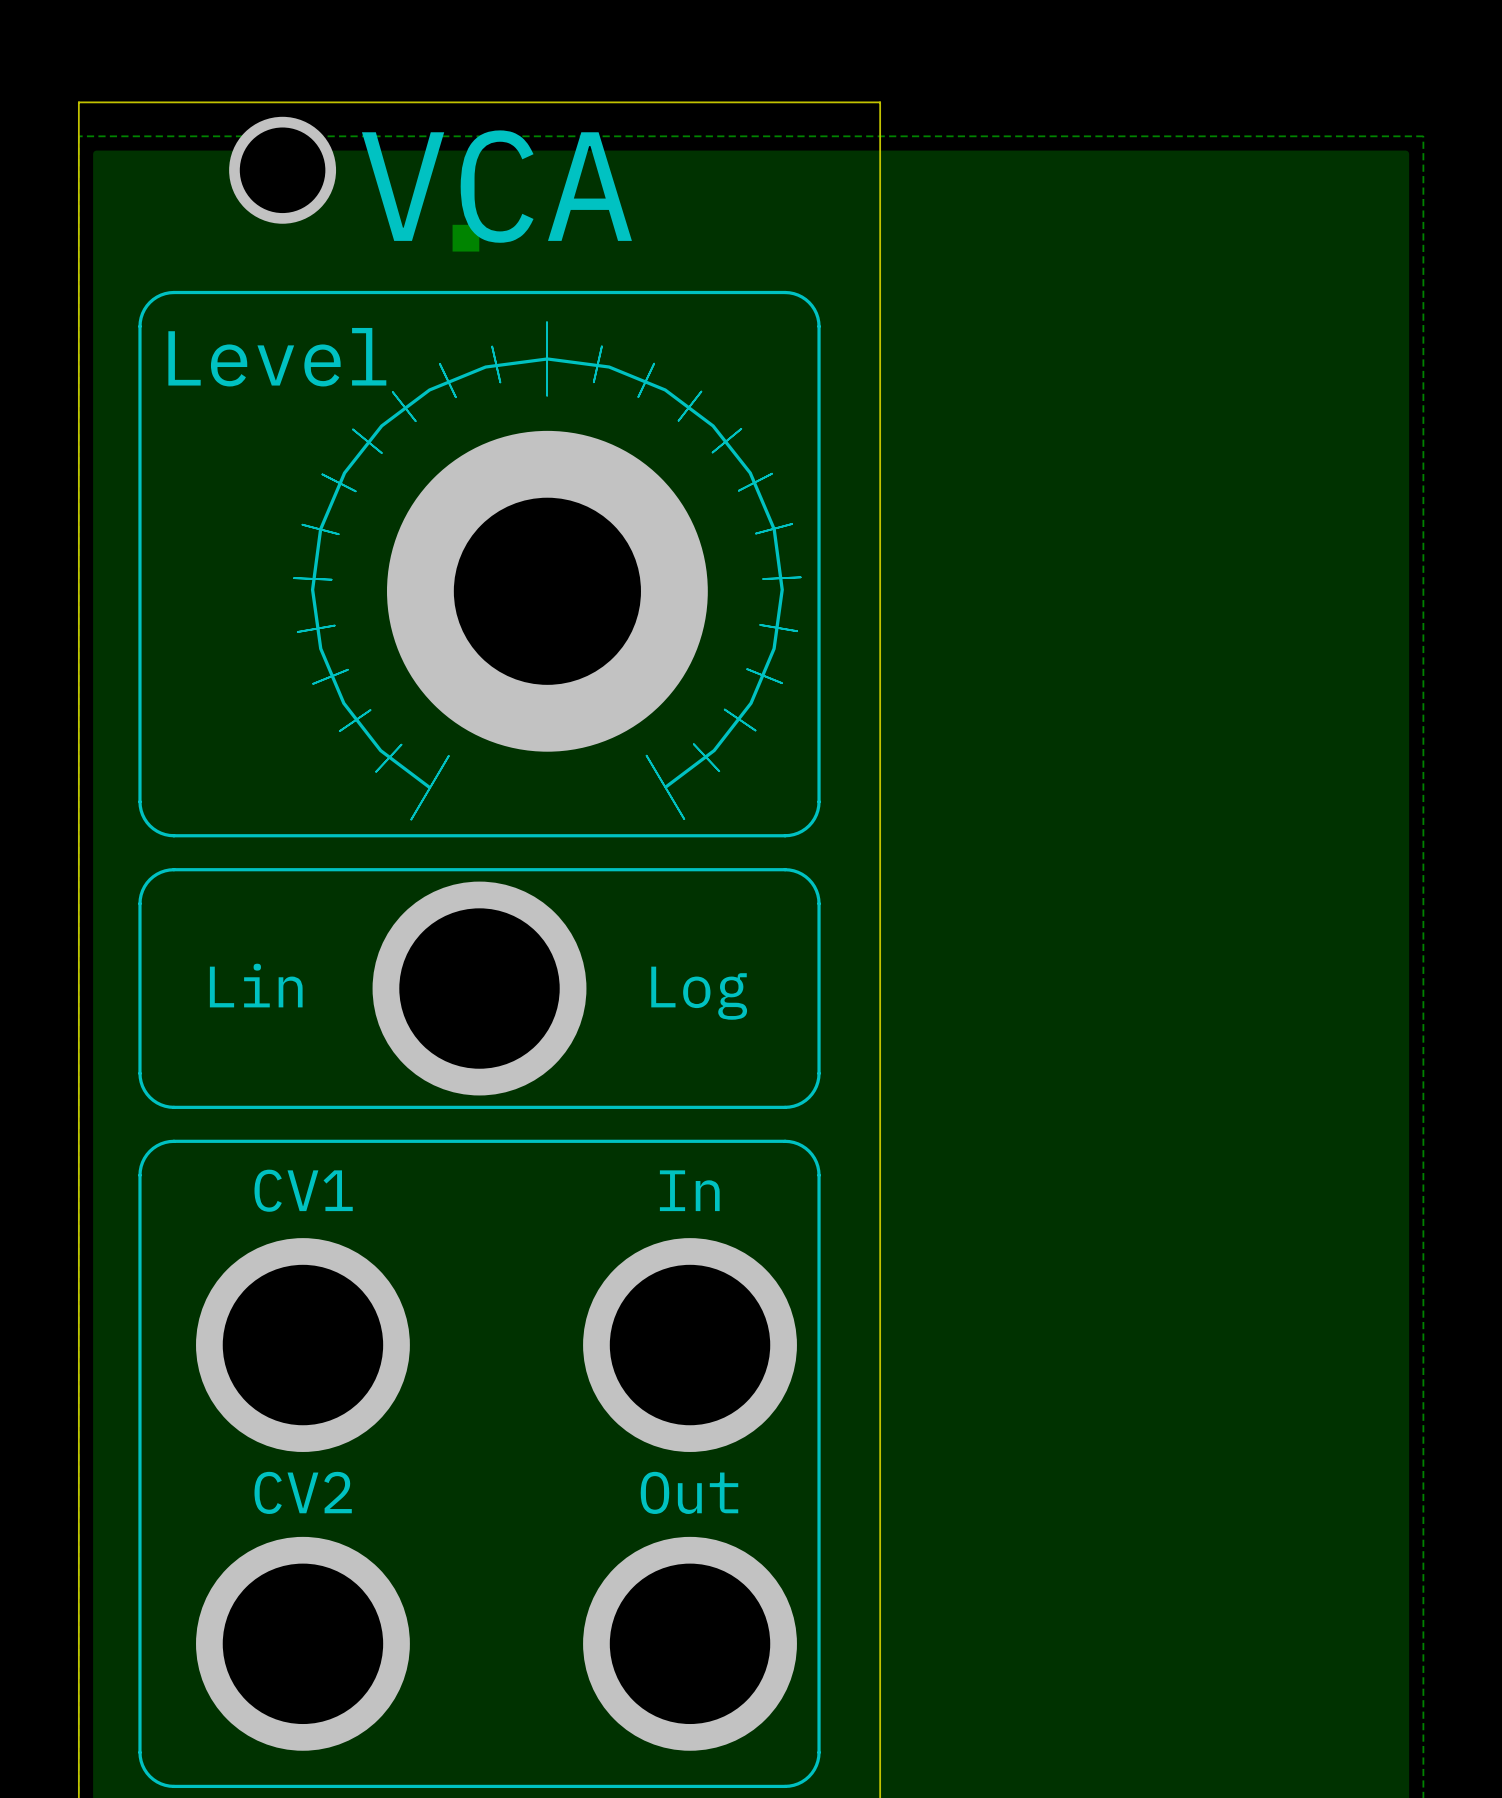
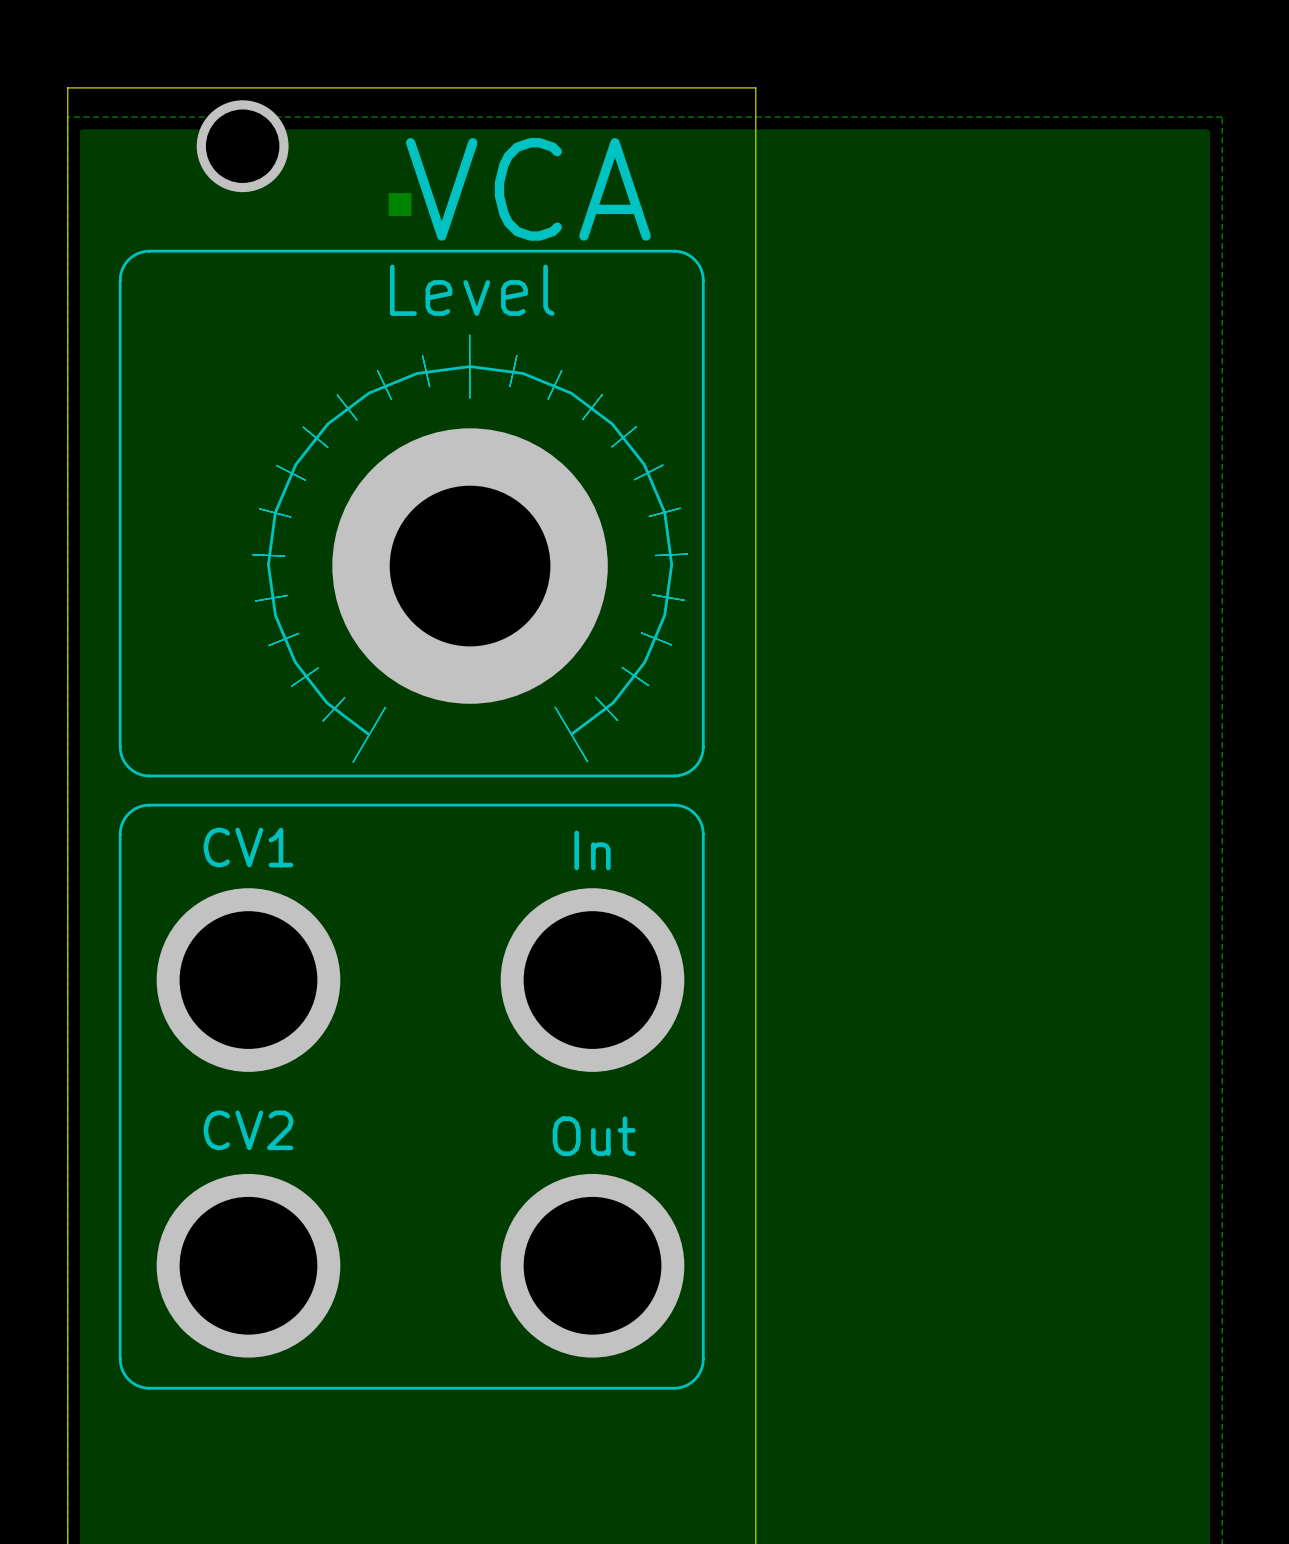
text position: VCA (496, 186) -> VCA (528, 189)
text position: Level (277, 357) -> Level (472, 290)
drawing position: (547, 570) -> (470, 548)
via position: (547, 591) -> (470, 566)
line: (139, 801) (142, 814) (149, 825) (160, 833) (173, 835) (785, 835) (798, 833) (809, 825) (816, 814) (819, 801) -> (120, 688) (121, 754) (131, 769) (149, 775) (677, 775) (691, 769) (702, 754) (703, 688)
line: (139, 971) (141, 894) (144, 886) (153, 876) (165, 870) (173, 869) (789, 869) (805, 876) (814, 886) (817, 894) (819, 971) -> (120, 834) (122, 823) (128, 813) (138, 807) (149, 805) (674, 805) (685, 807) (694, 813) (701, 823) (703, 834)
text: Lin (256, 985) -> none
via: (479, 988) -> none
text: Log (699, 993) -> none
line: (139, 1073) (142, 1086) (149, 1097) (160, 1104) (173, 1107) (785, 1107) (798, 1104) (809, 1097) (816, 1086) (819, 1073) -> (120, 921) (120, 1009)
via: none -> (248, 980)
via: none -> (592, 980)
line: (139, 1175) (142, 1162) (149, 1151) (160, 1143) (173, 1141) (785, 1141) (798, 1143) (809, 1151) (816, 1162) (819, 1175) -> (703, 921) (703, 1009)
text position: CV1 (303, 1190) -> CV1 (248, 847)
text position: In (689, 1190) -> In (592, 850)
via: (302, 1345) -> none
via: (690, 1345) -> none
via: none -> (248, 1265)
via: none -> (592, 1265)
text position: CV2 (303, 1492) -> CV2 (248, 1130)
text position: Out (689, 1492) -> Out (594, 1136)
line: (139, 1582) (140, 1756) (146, 1773) (156, 1781) (165, 1785) (785, 1786) (798, 1783) (805, 1779) (814, 1769) (818, 1756) (819, 1582) -> (120, 1359) (122, 1370) (128, 1379) (138, 1386) (149, 1388) (674, 1388) (685, 1386) (694, 1379) (701, 1370) (703, 1359)
via: (302, 1643) -> none
via: (690, 1643) -> none

